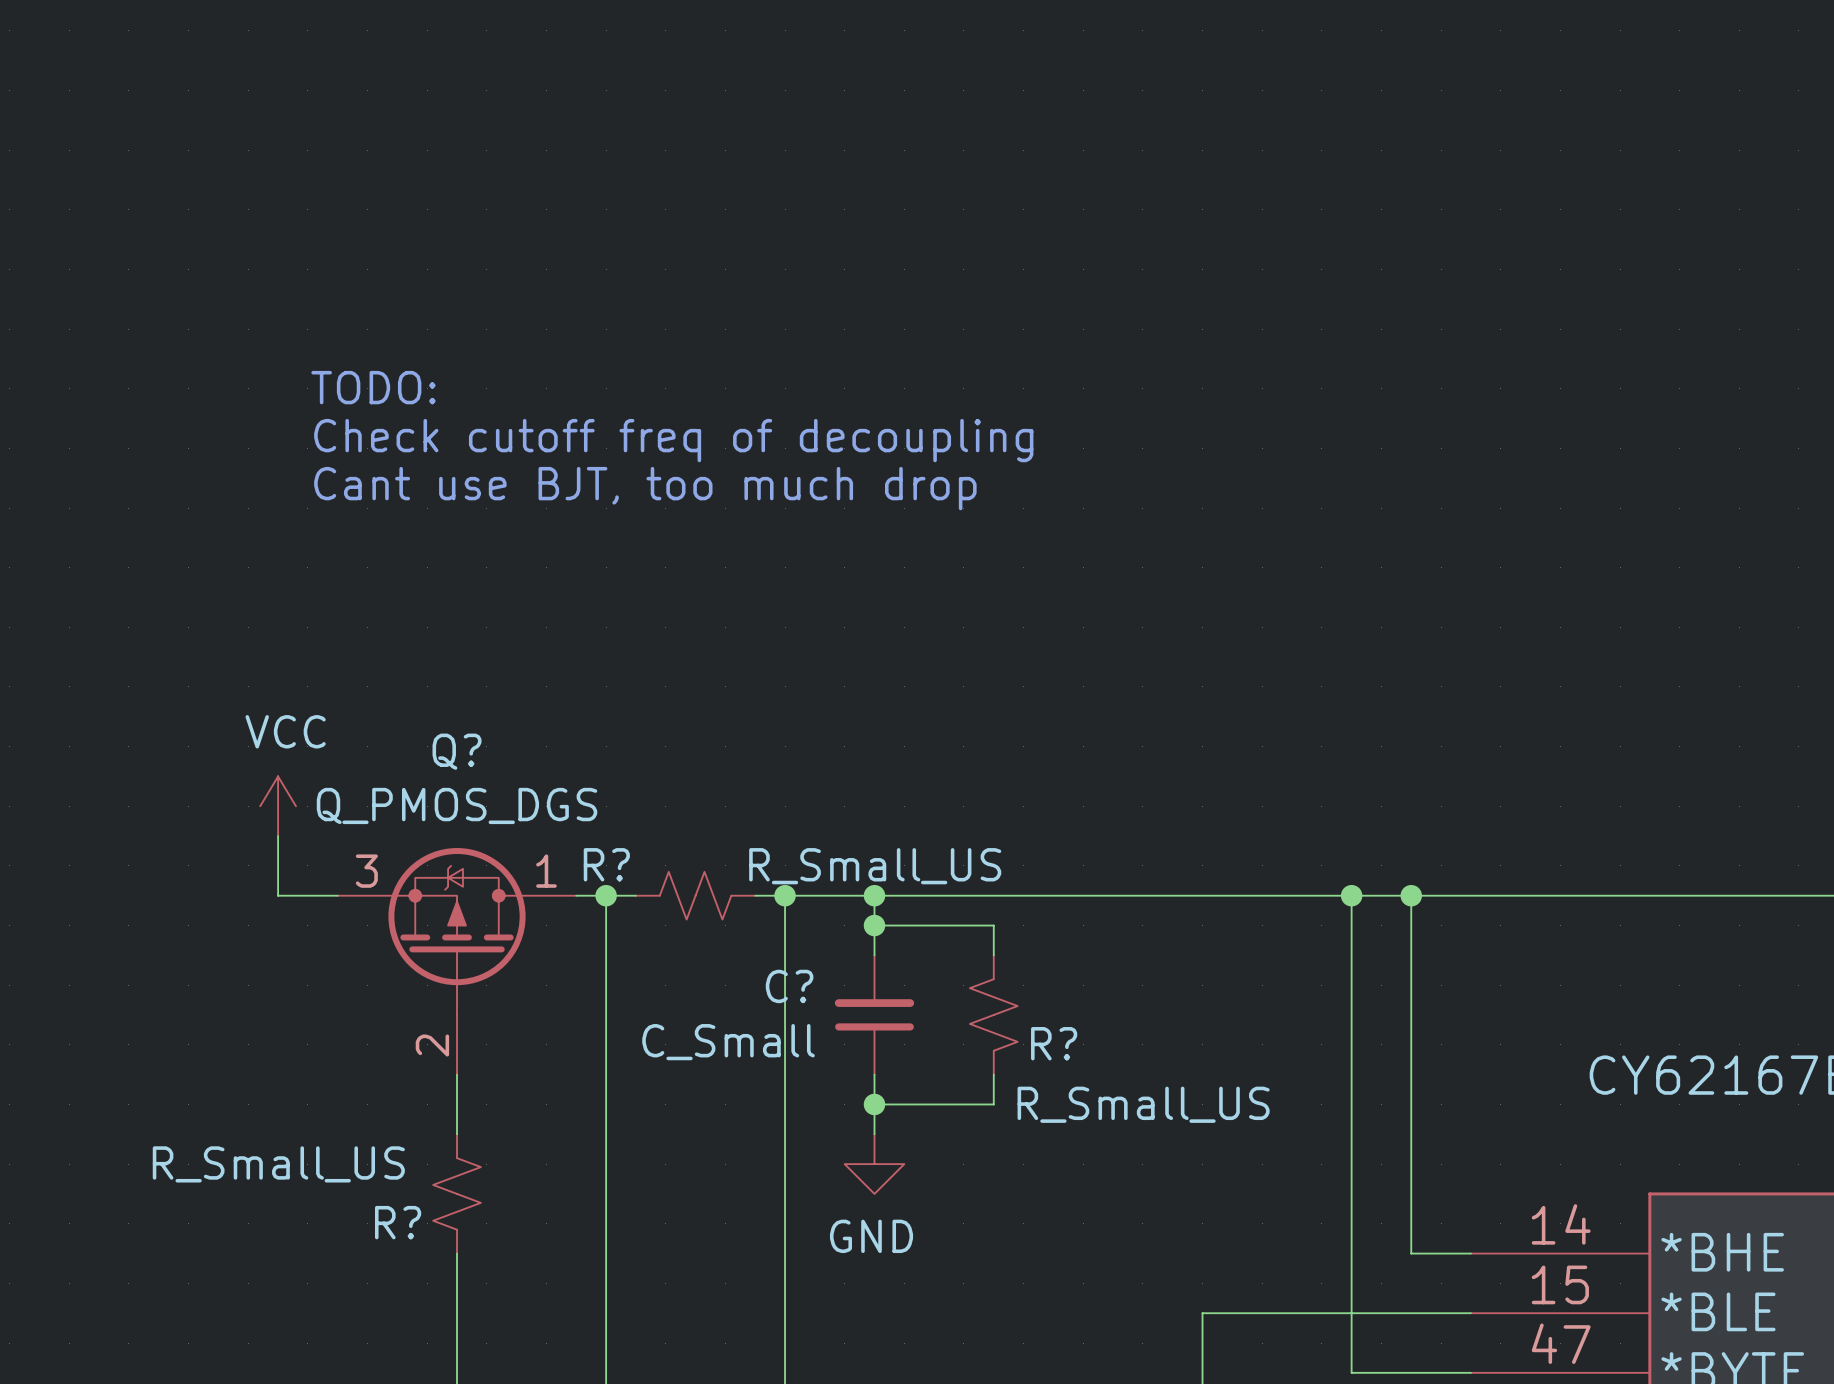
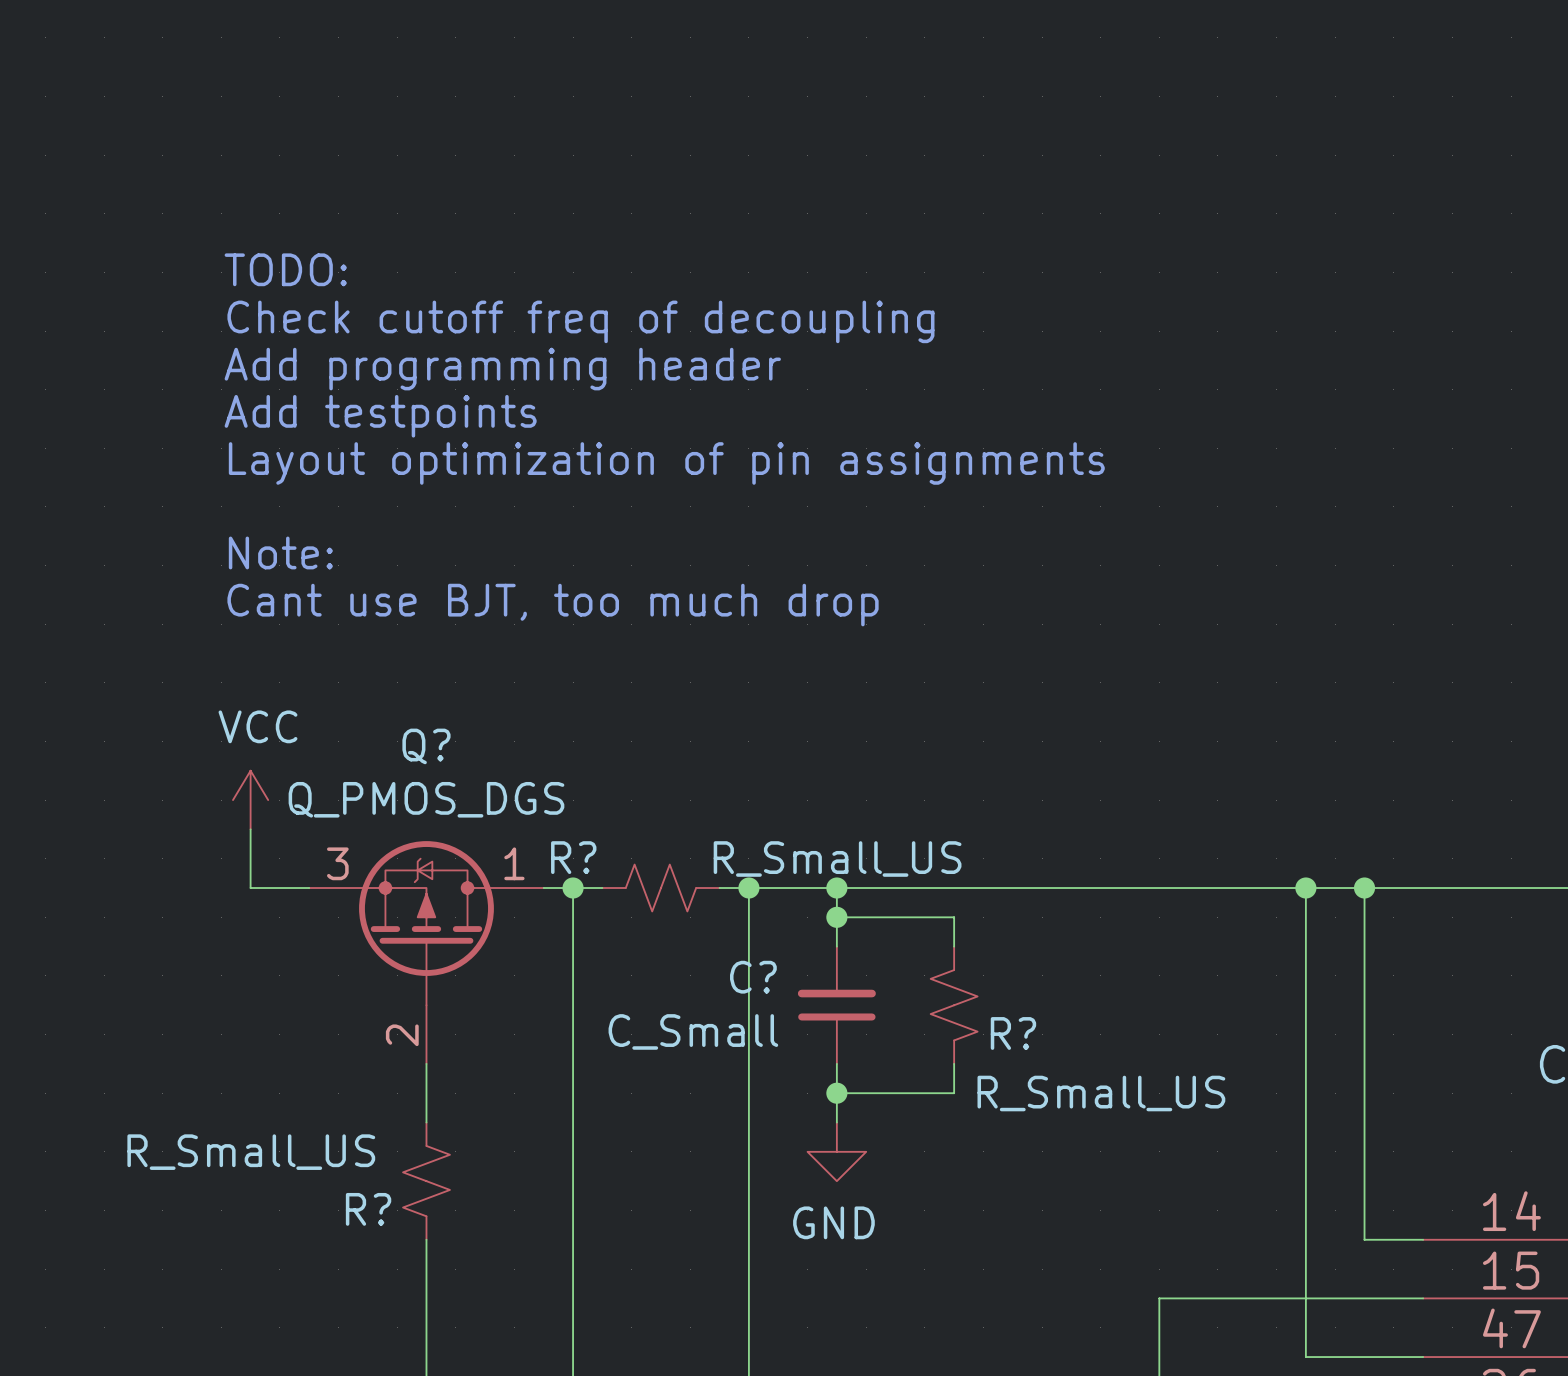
text: none -> Add programming header (502, 369)
text position: TODO: (373, 387) -> TODO: (285, 269)
text: none -> Add testpoints (380, 416)
text position: Check cutoff freq of decoupling (673, 440) -> Check cutoff freq of decoupling (580, 321)
text: none -> Layout optimization of pin assignments (666, 463)
text position: Cant use BJT, too much drop (645, 488) -> Cant use BJT, too much drop (553, 605)
text: none -> Note: (280, 552)

